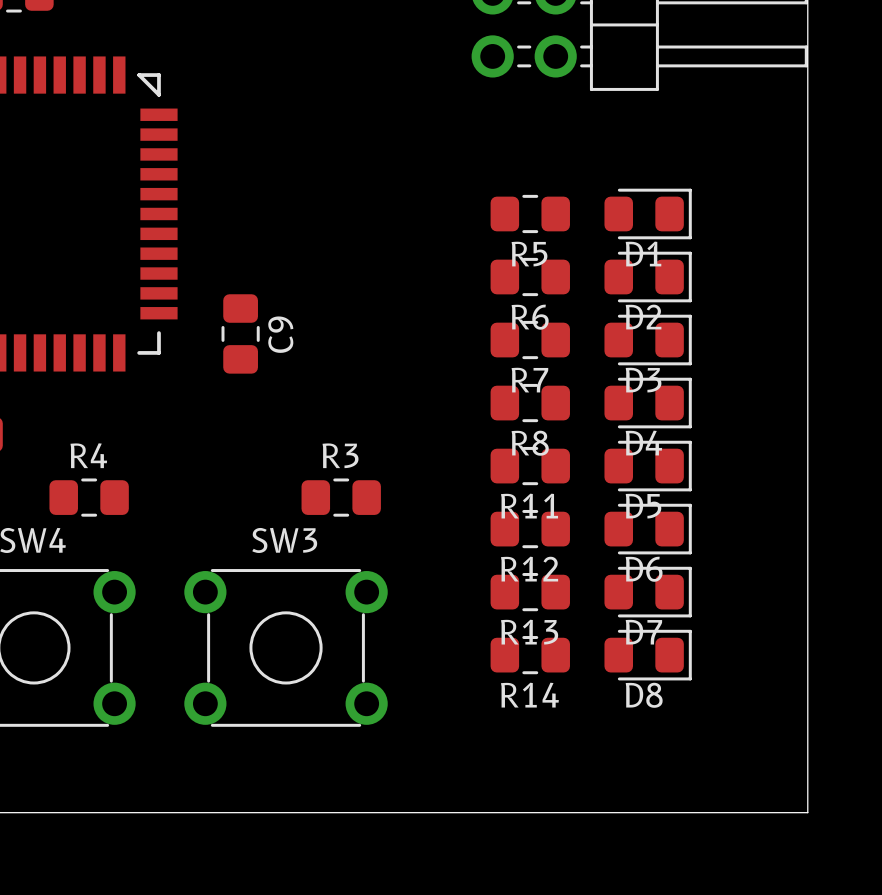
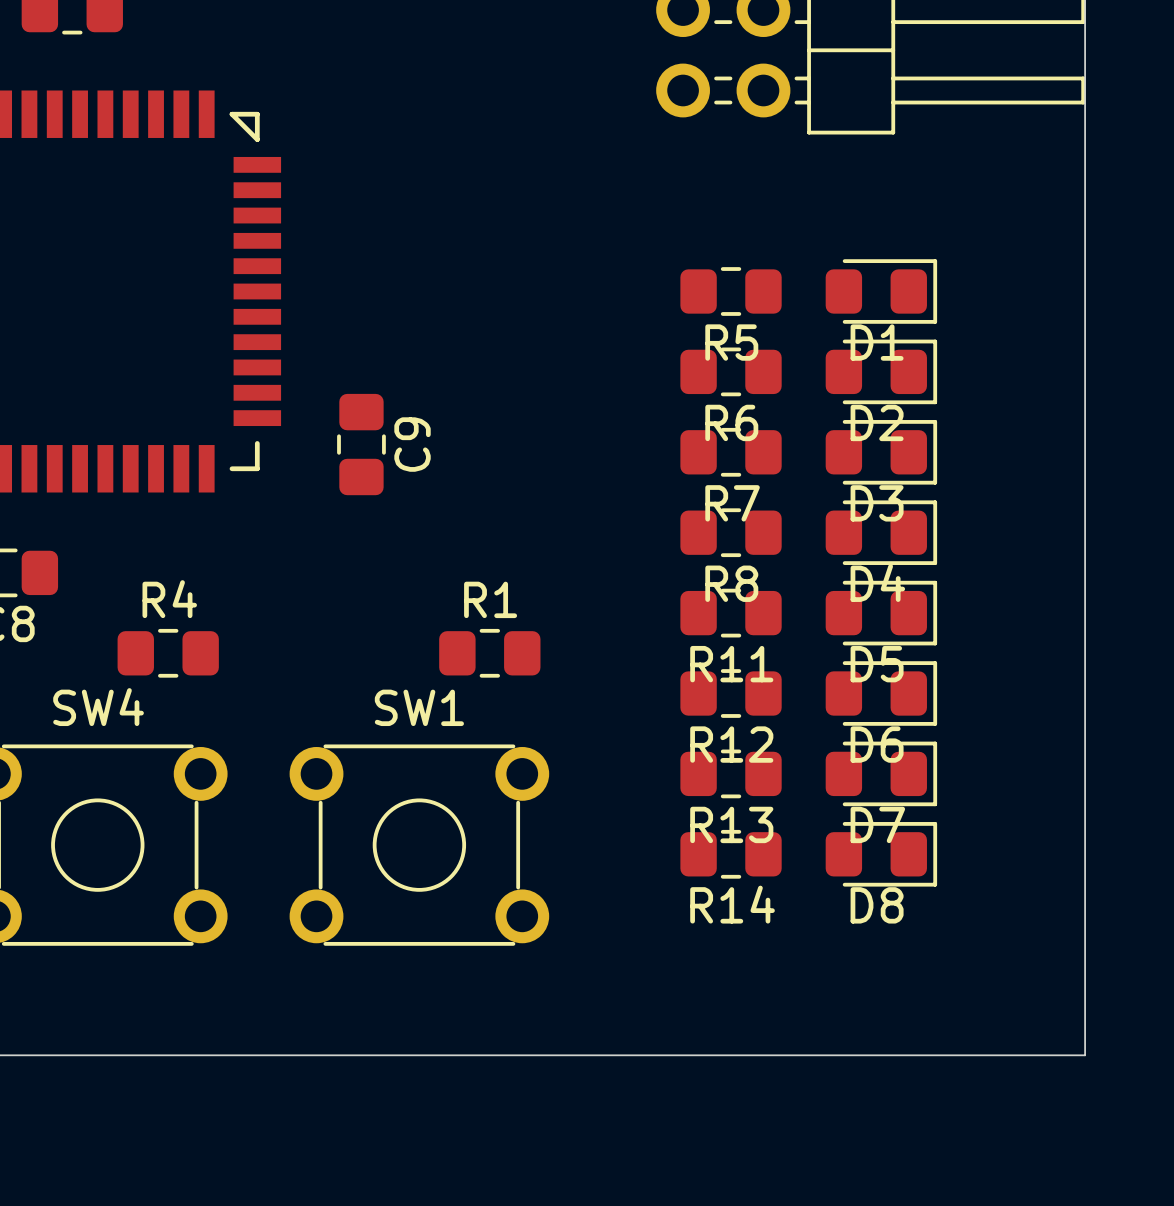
R3 name: R3 (340, 455) -> R1 (490, 599)
SW3 name: SW3 (284, 540) -> SW1 (419, 707)

